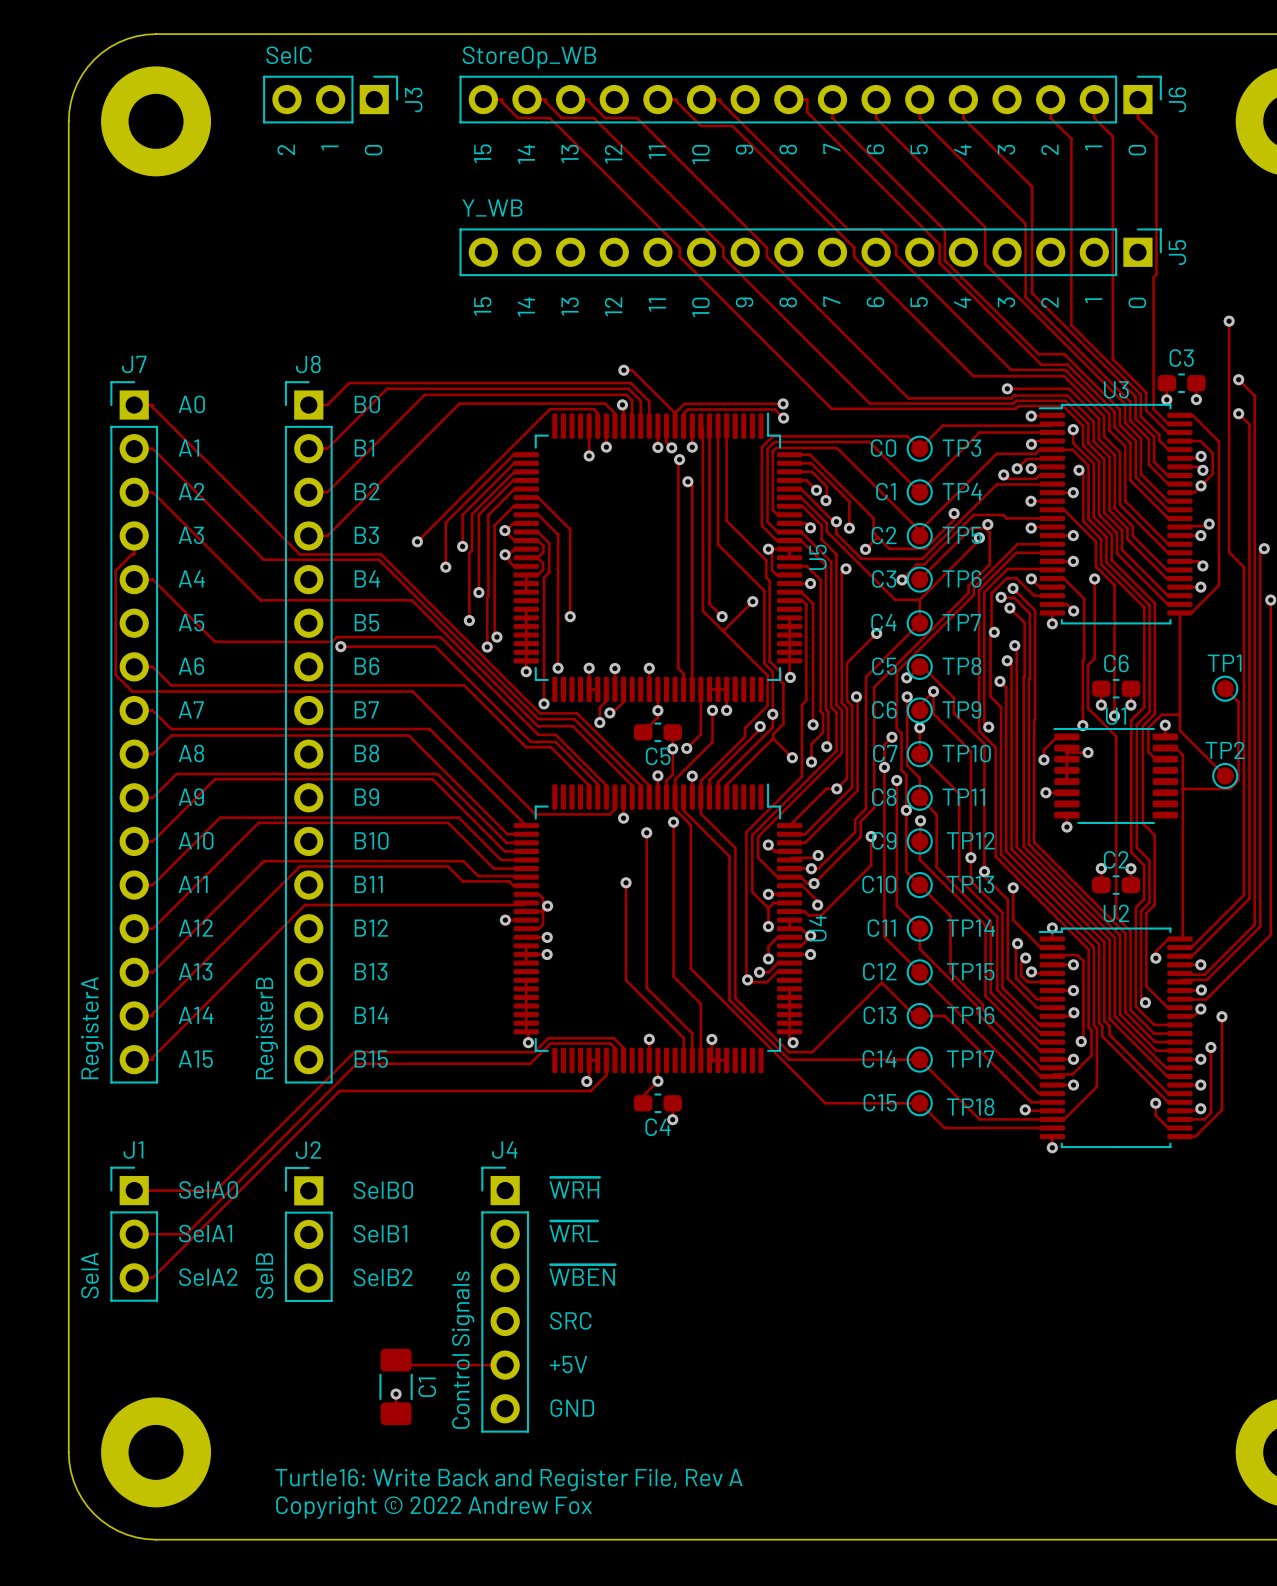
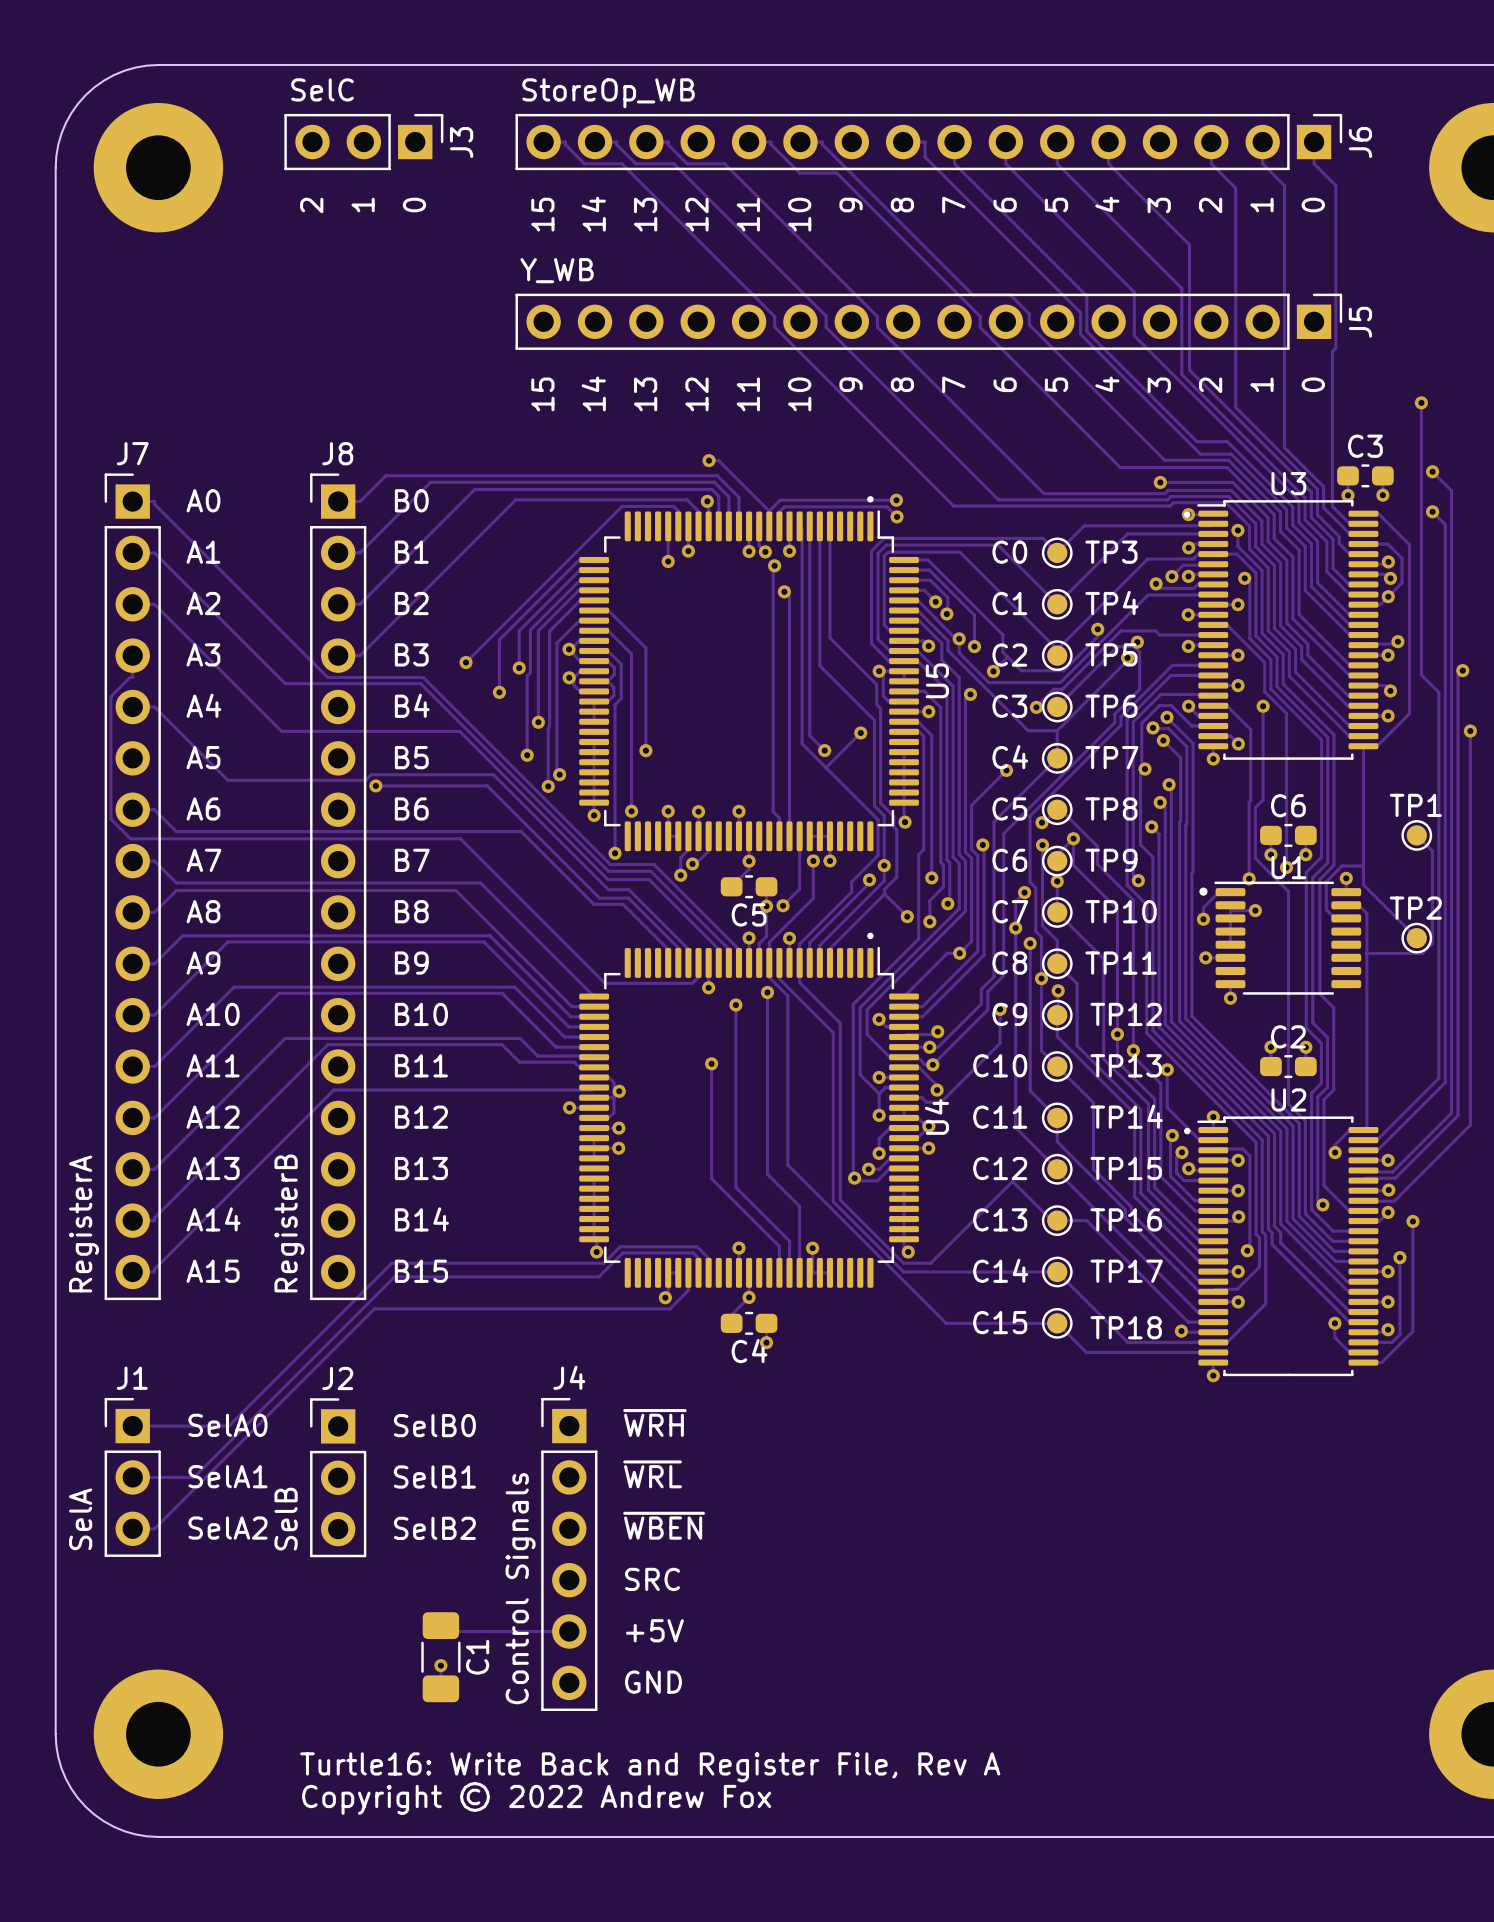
U3 footprint: [1038, 403, 1193, 625] -> [1184, 500, 1379, 760]
U5 footprint: [513, 412, 803, 703] -> [579, 496, 919, 852]
U1 footprint: [1053, 727, 1178, 825] -> [1199, 881, 1362, 995]
U4 footprint: [513, 783, 803, 1074] -> [579, 932, 919, 1288]
U2 footprint: [1038, 927, 1193, 1149] -> [1184, 1116, 1379, 1377]

